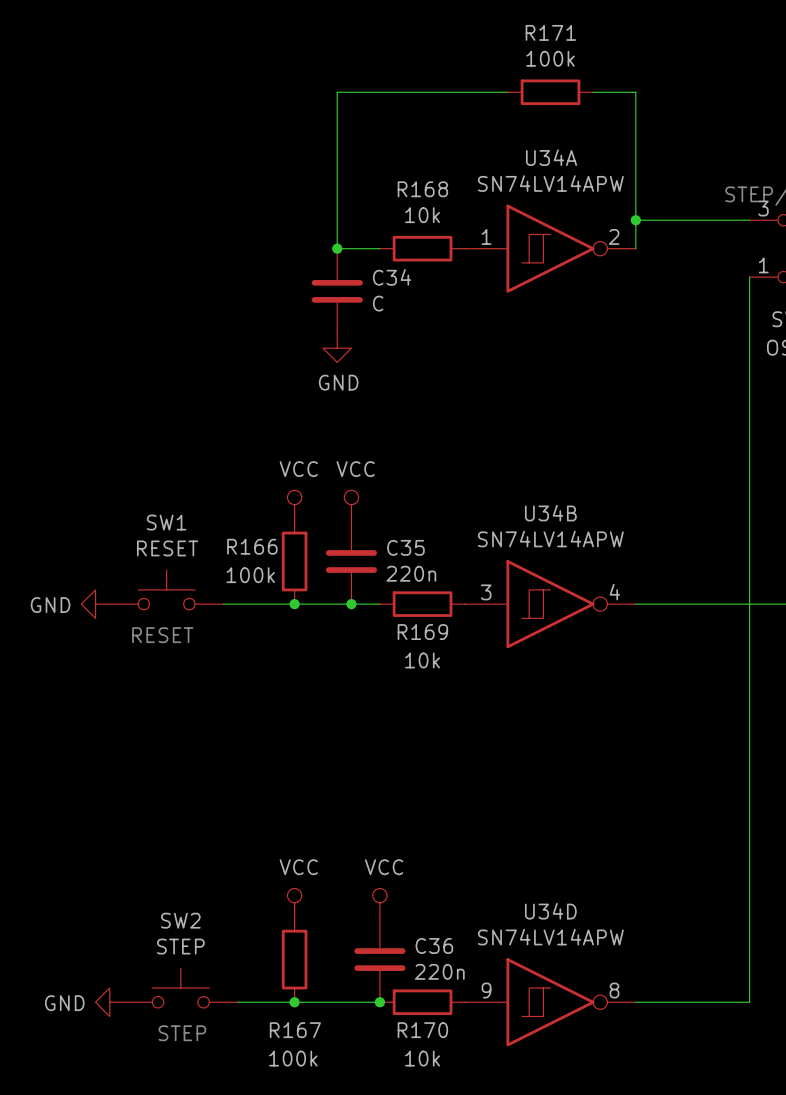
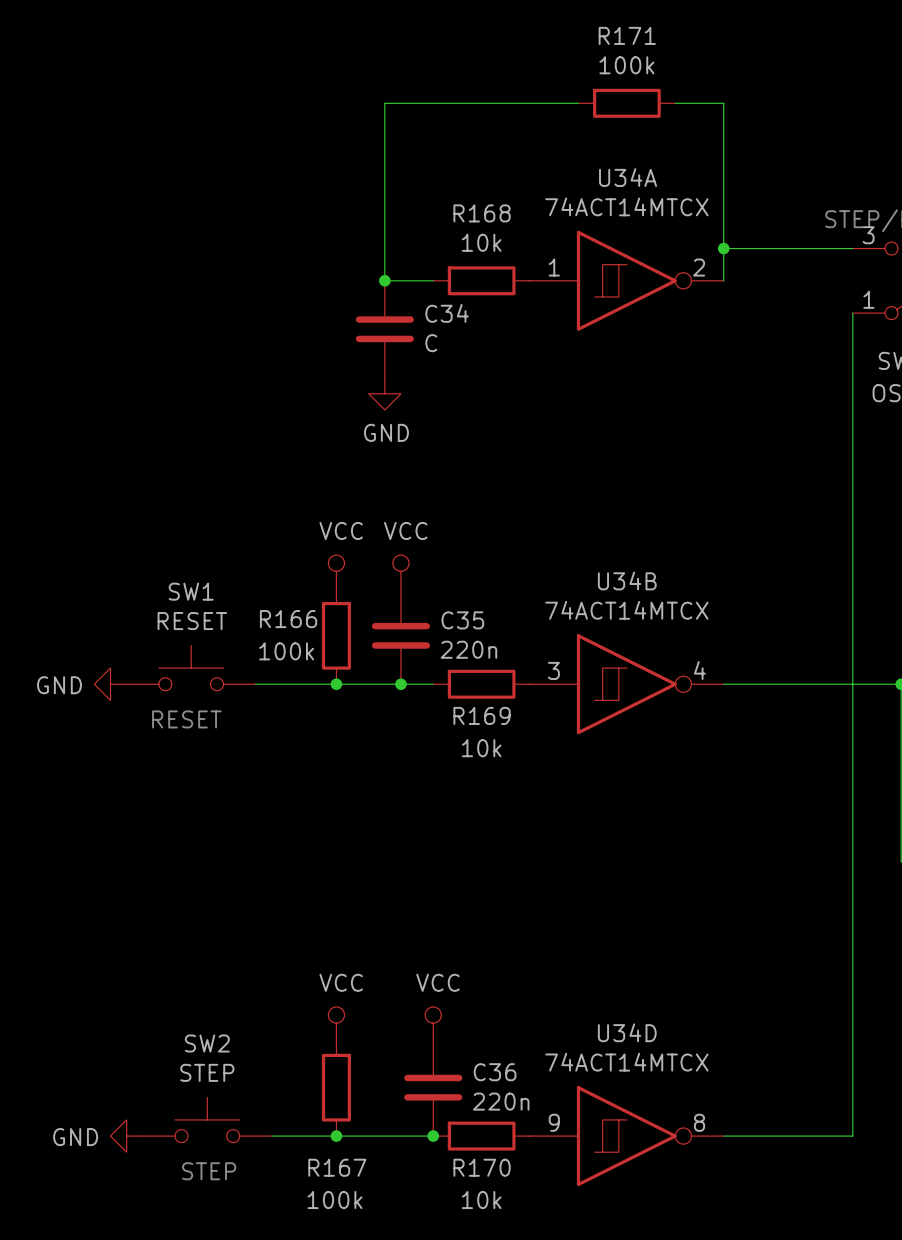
U34A value: SN74LV14APW (550, 183) -> 74ACT14MTCX (626, 206)
U34B value: SN74LV14APW (550, 539) -> 74ACT14MTCX (626, 610)
U34D value: SN74LV14APW (550, 937) -> 74ACT14MTCX (626, 1062)

